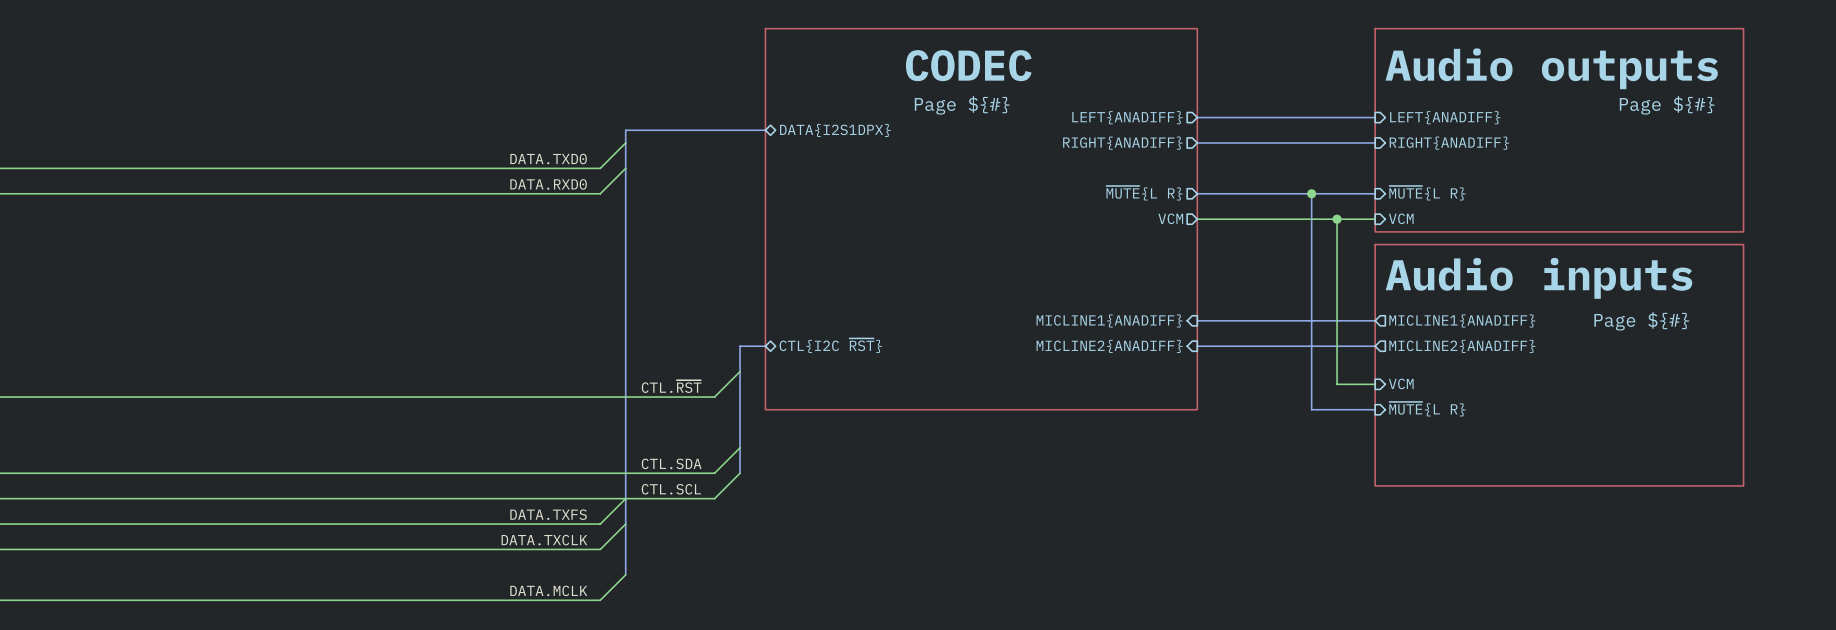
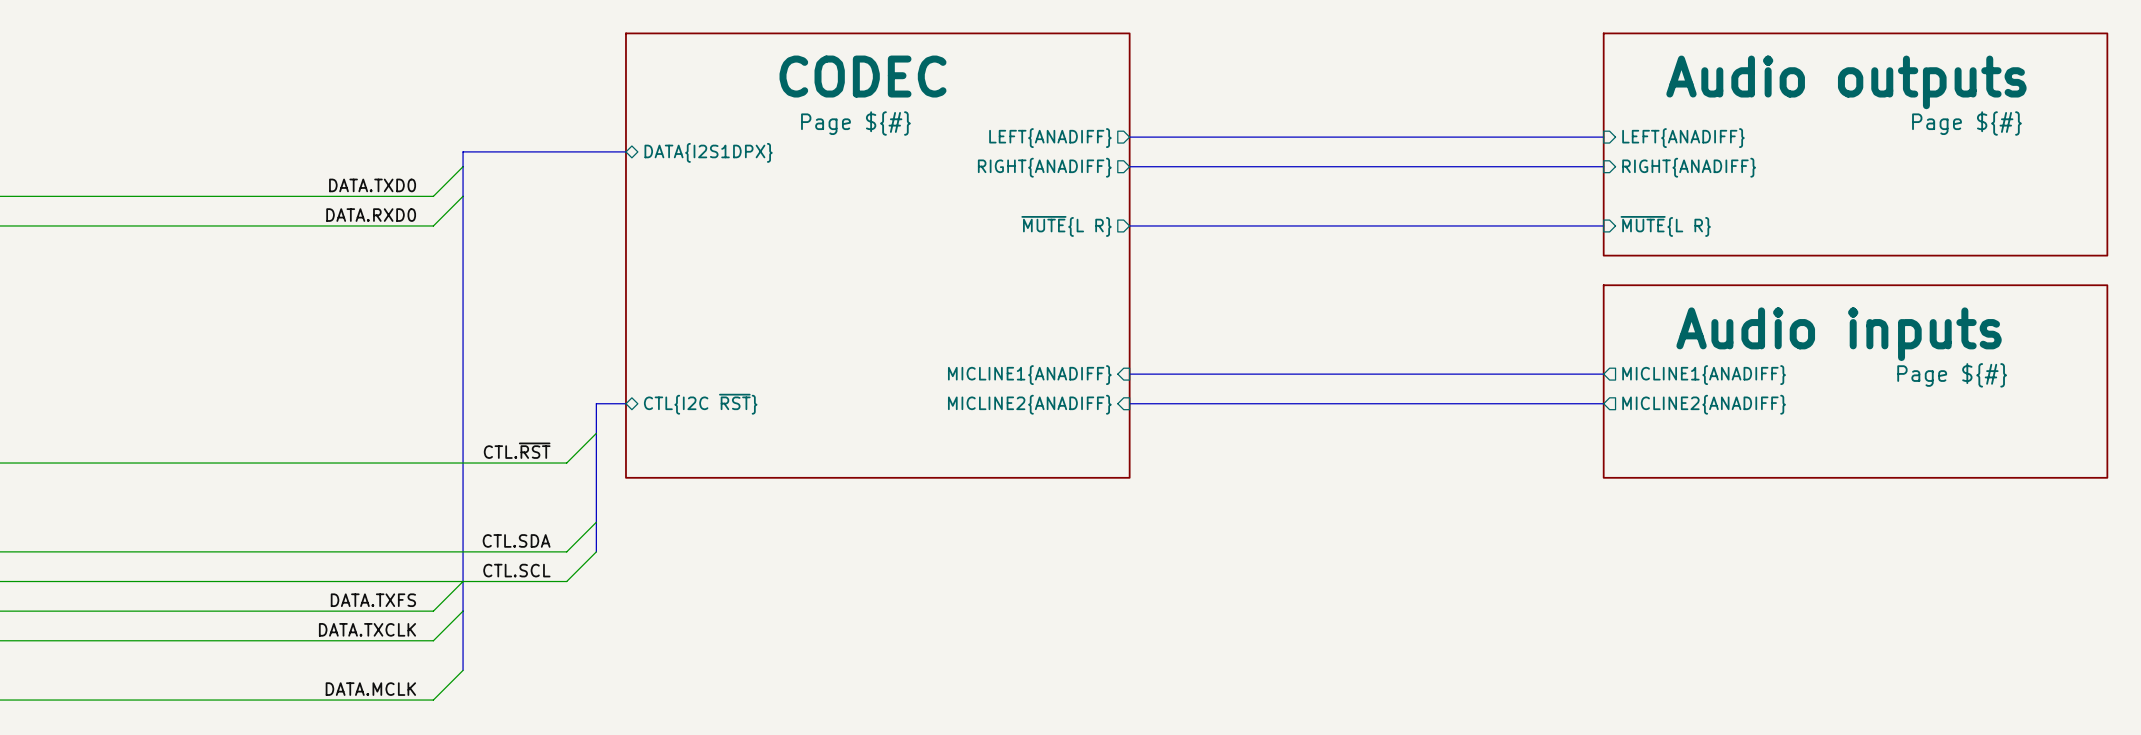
bus: none -> (1129, 137) (1396, 137)
sheet pin position: LEFT{ANADIFF} (1127, 117) -> LEFT{ANADIFF} (1050, 138)
sheet Audio outputs: none -> (1855, 144)
bus: (765, 130) (625, 130) (625, 574) -> (625, 151) (463, 151) (463, 670)
sheet pin position: DATA{I2S1DPX} (835, 130) -> DATA{I2S1DPX} (708, 152)
sheet Audio outputs: (1559, 130) -> none
wire: (625, 142) (600, 168) (371, 168) -> (463, 166) (433, 196)
bus: none -> (1129, 166) (1396, 166)
sheet pin position: RIGHT{ANADIFF} (1122, 143) -> RIGHT{ANADIFF} (1044, 167)
label position: DATA.TXD0 (548, 159) -> DATA.TXD0 (372, 185)
wire: (625, 168) (600, 193) (371, 193) -> (463, 196) (433, 225)
label position: DATA.RXD0 (548, 184) -> DATA.RXD0 (371, 215)
bus: none -> (1129, 225) (1396, 225)
sheet pin position: ~{MUTE}{L R} (1144, 193) -> ~{MUTE}{L R} (1066, 226)
bus: (1311, 193) (1311, 409) (1375, 409) -> none
junction: (1311, 193) -> none
sheet pin: VCM (1170, 218) -> none
sheet pin: VCM (1401, 218) -> none
sheet CODEC position: (981, 219) -> (877, 255)
wire: (1197, 219) (1375, 219) -> none
wire: (1337, 219) (1337, 384) (1375, 384) -> none
junction: (1337, 219) -> none
bus: none -> (1129, 374) (1396, 374)
sheet pin position: MICLINE1{ANADIFF} (1109, 320) -> MICLINE1{ANADIFF} (1029, 375)
sheet Audio inputs: none -> (1855, 381)
sheet pin position: CTL{I2C ~{RST}} (830, 345) -> CTL{I2C ~{RST}} (700, 404)
bus: (765, 346) (740, 346) (740, 473) -> (625, 403) (596, 403) (596, 551)
bus: none -> (1129, 403) (1396, 403)
sheet pin position: MICLINE2{ANADIFF} (1109, 346) -> MICLINE2{ANADIFF} (1029, 404)
sheet Audio inputs: (1559, 365) -> none
wire: (740, 371) (714, 397) (485, 397) -> (596, 433) (566, 463)
sheet pin: VCM (1401, 383) -> none
label position: CTL.~{RST} (671, 386) -> CTL.~{RST} (517, 450)
sheet pin: ~{MUTE}{L R} (1427, 409) -> none
wire: (740, 447) (714, 473) (485, 473) -> (596, 522) (566, 551)
label position: CTL.SDA (671, 463) -> CTL.SDA (516, 540)
wire: (740, 473) (714, 498) (485, 498) -> (596, 551) (566, 581)
label position: CTL.SCL (671, 489) -> CTL.SCL (516, 570)
wire: (625, 498) (600, 524) (371, 524) -> (463, 581) (433, 611)
label position: DATA.TXFS (548, 514) -> DATA.TXFS (373, 600)
wire: (625, 524) (600, 549) (371, 549) -> (463, 611) (433, 640)
label position: DATA.TXCLK (544, 540) -> DATA.TXCLK (367, 629)
wire: (625, 574) (600, 600) (371, 600) -> (463, 670) (433, 700)
label position: DATA.MCLK (548, 590) -> DATA.MCLK (370, 689)

